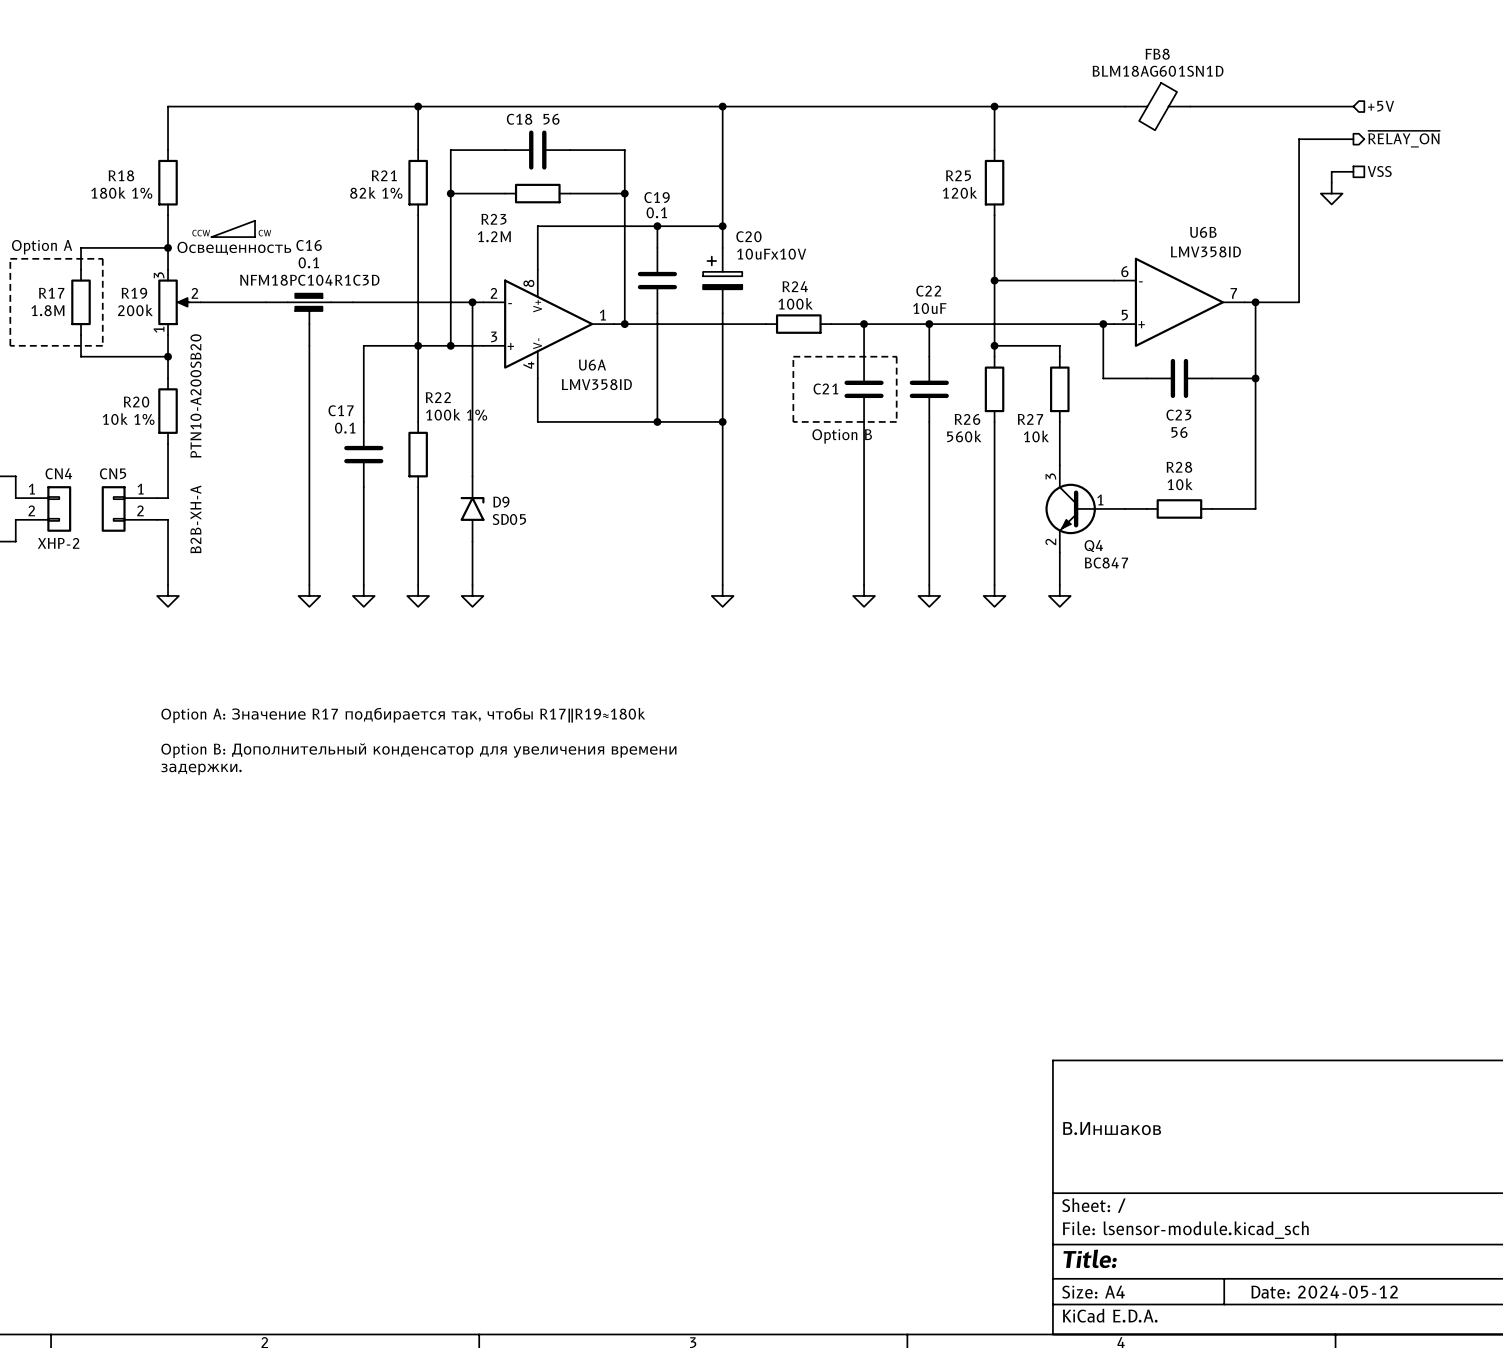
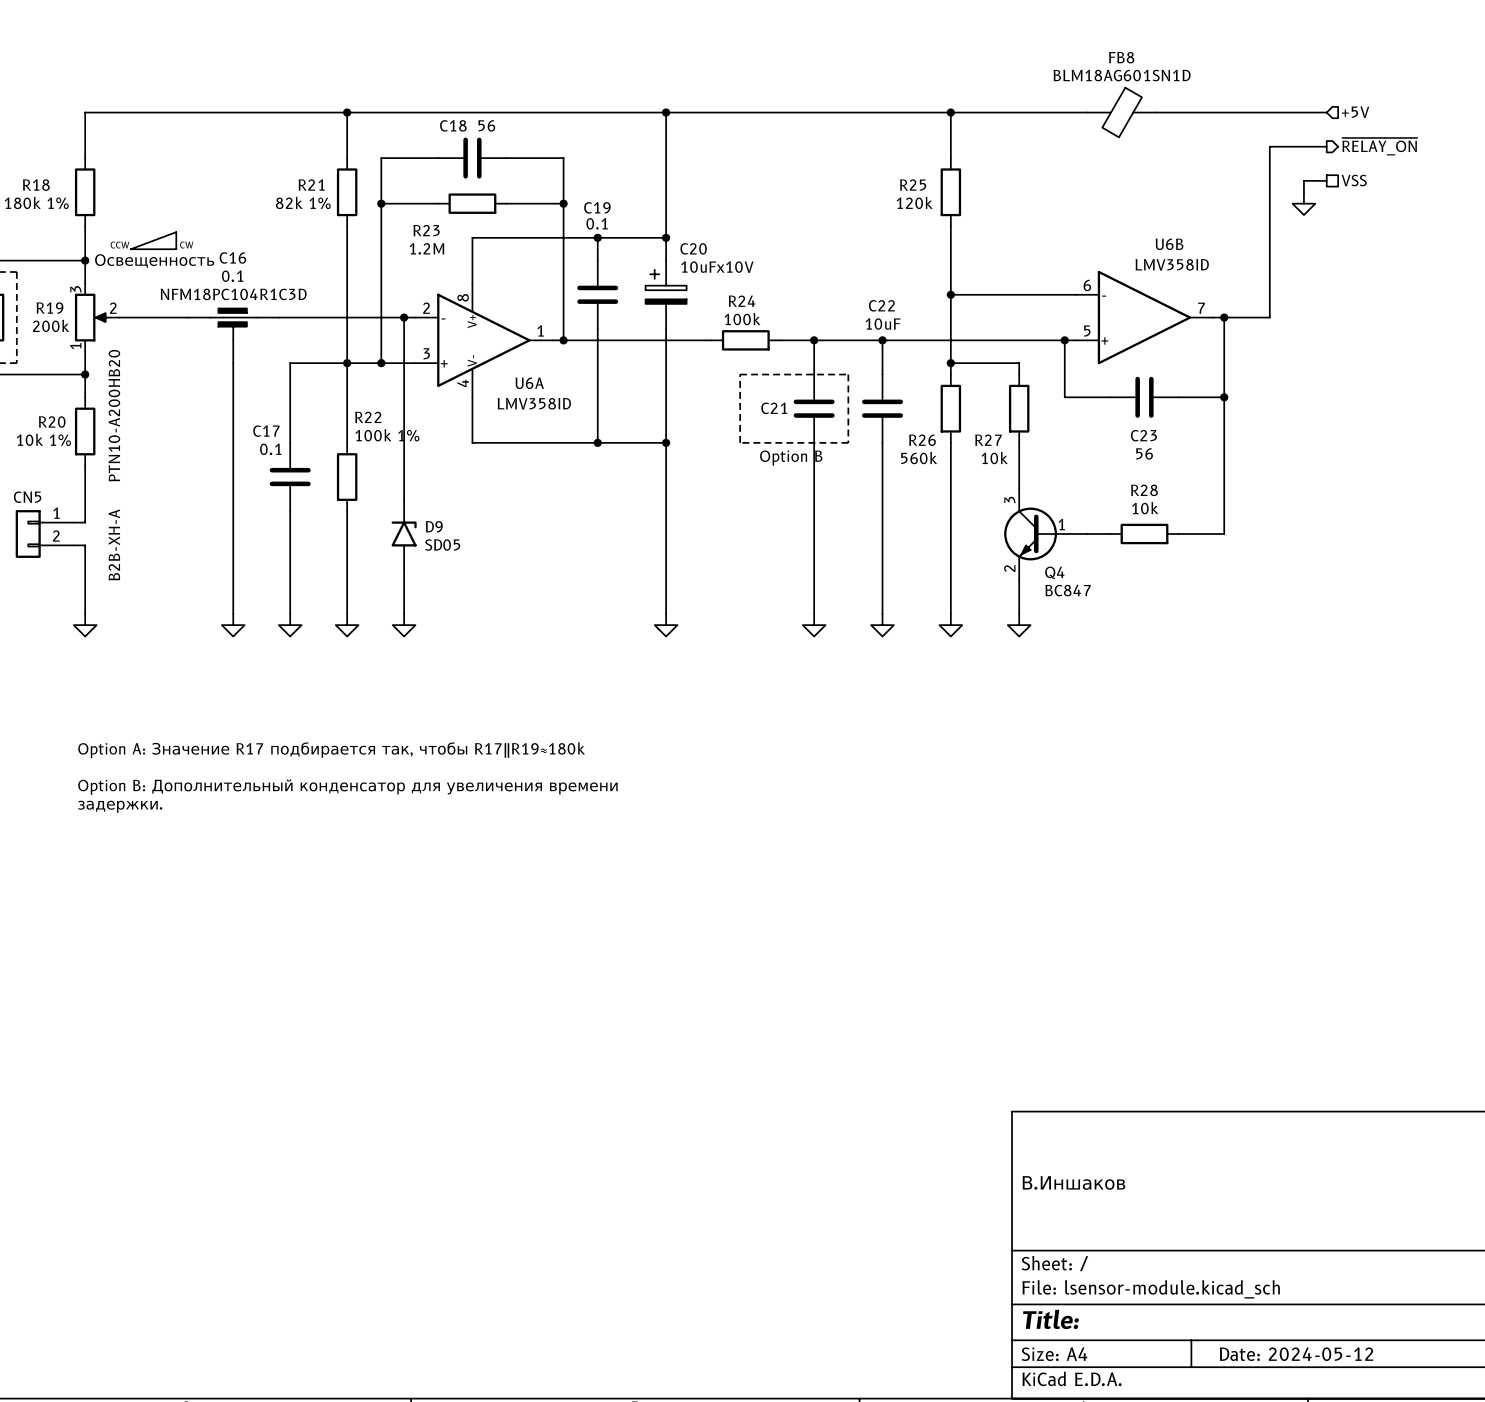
R19 text: PTN10-A200SB20 (195, 395) -> PTN10-A200HB20 (114, 415)

